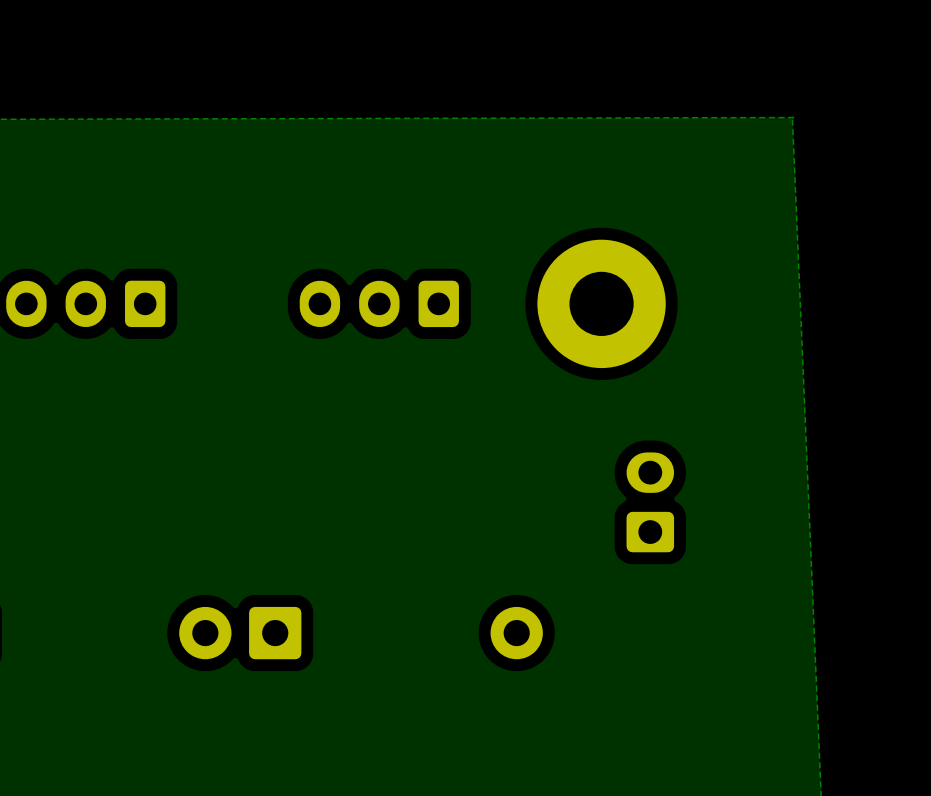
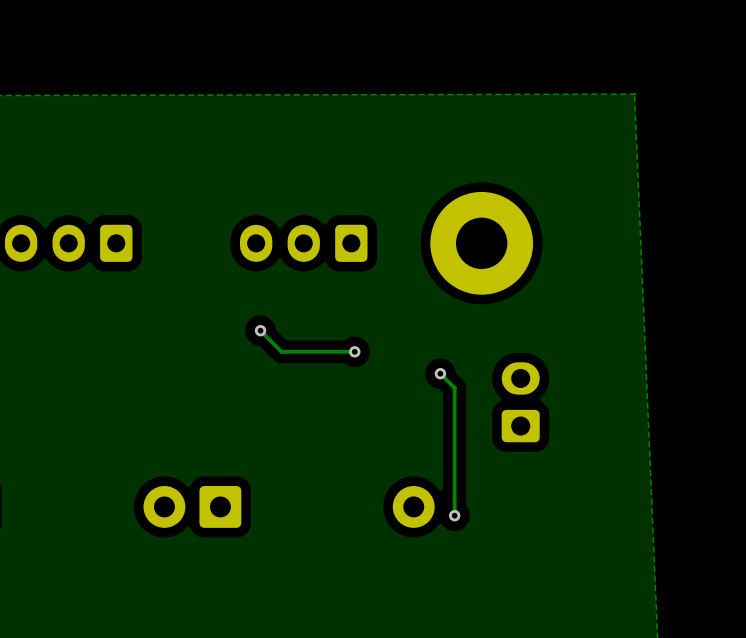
track: none -> (260, 330) (281, 351) (354, 351)
via: none -> (260, 330)
via: none -> (354, 351)
track: none -> (440, 373) (454, 387) (454, 515)
via: none -> (440, 373)
via: none -> (454, 515)

